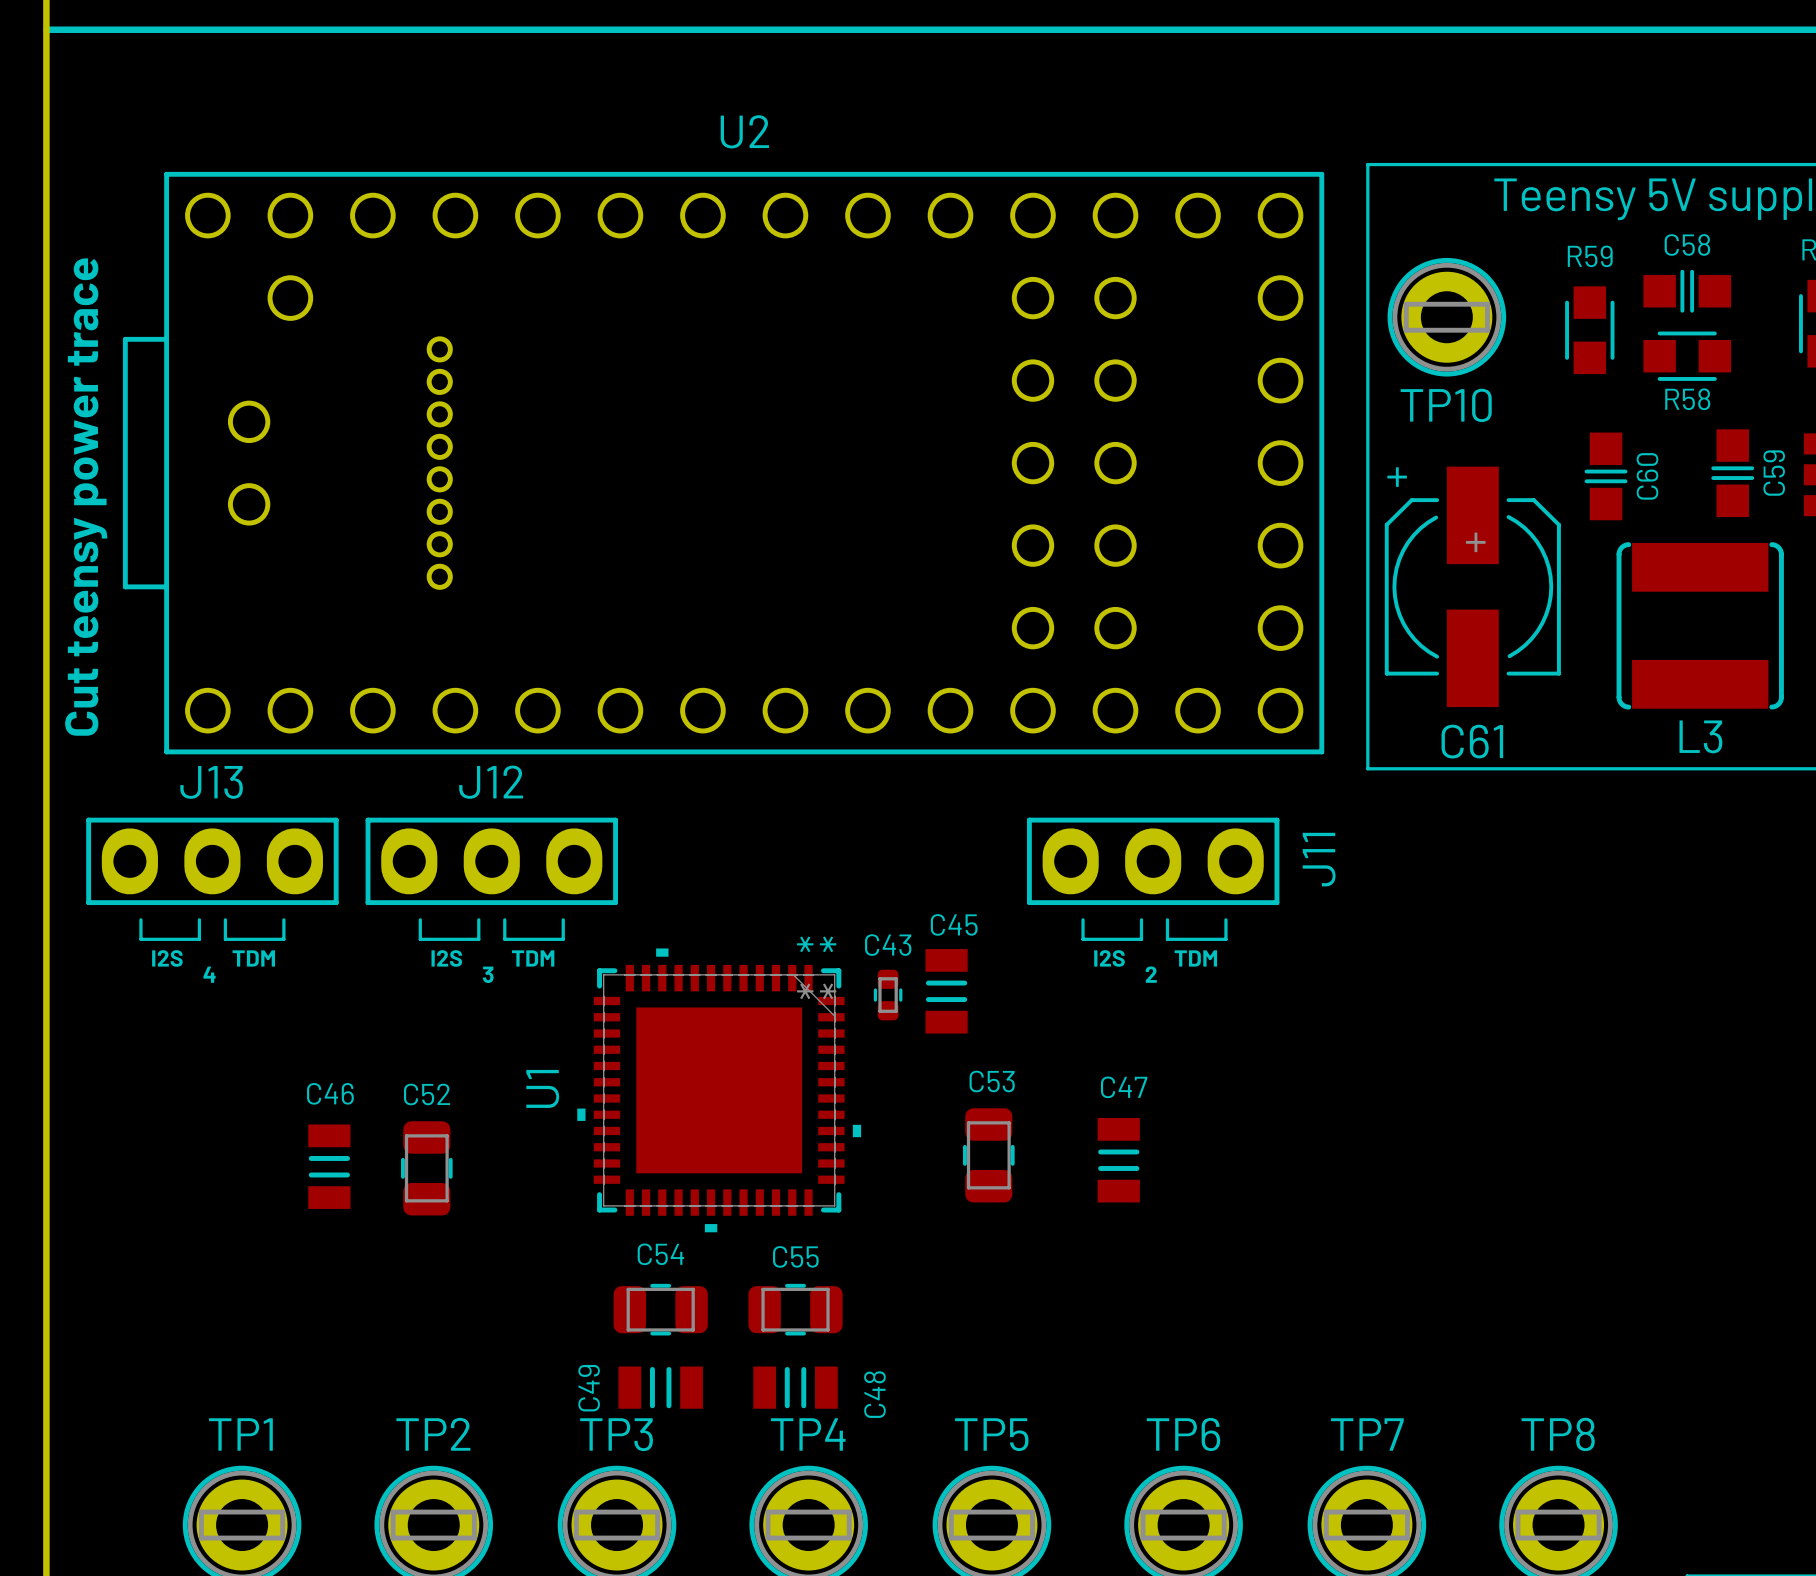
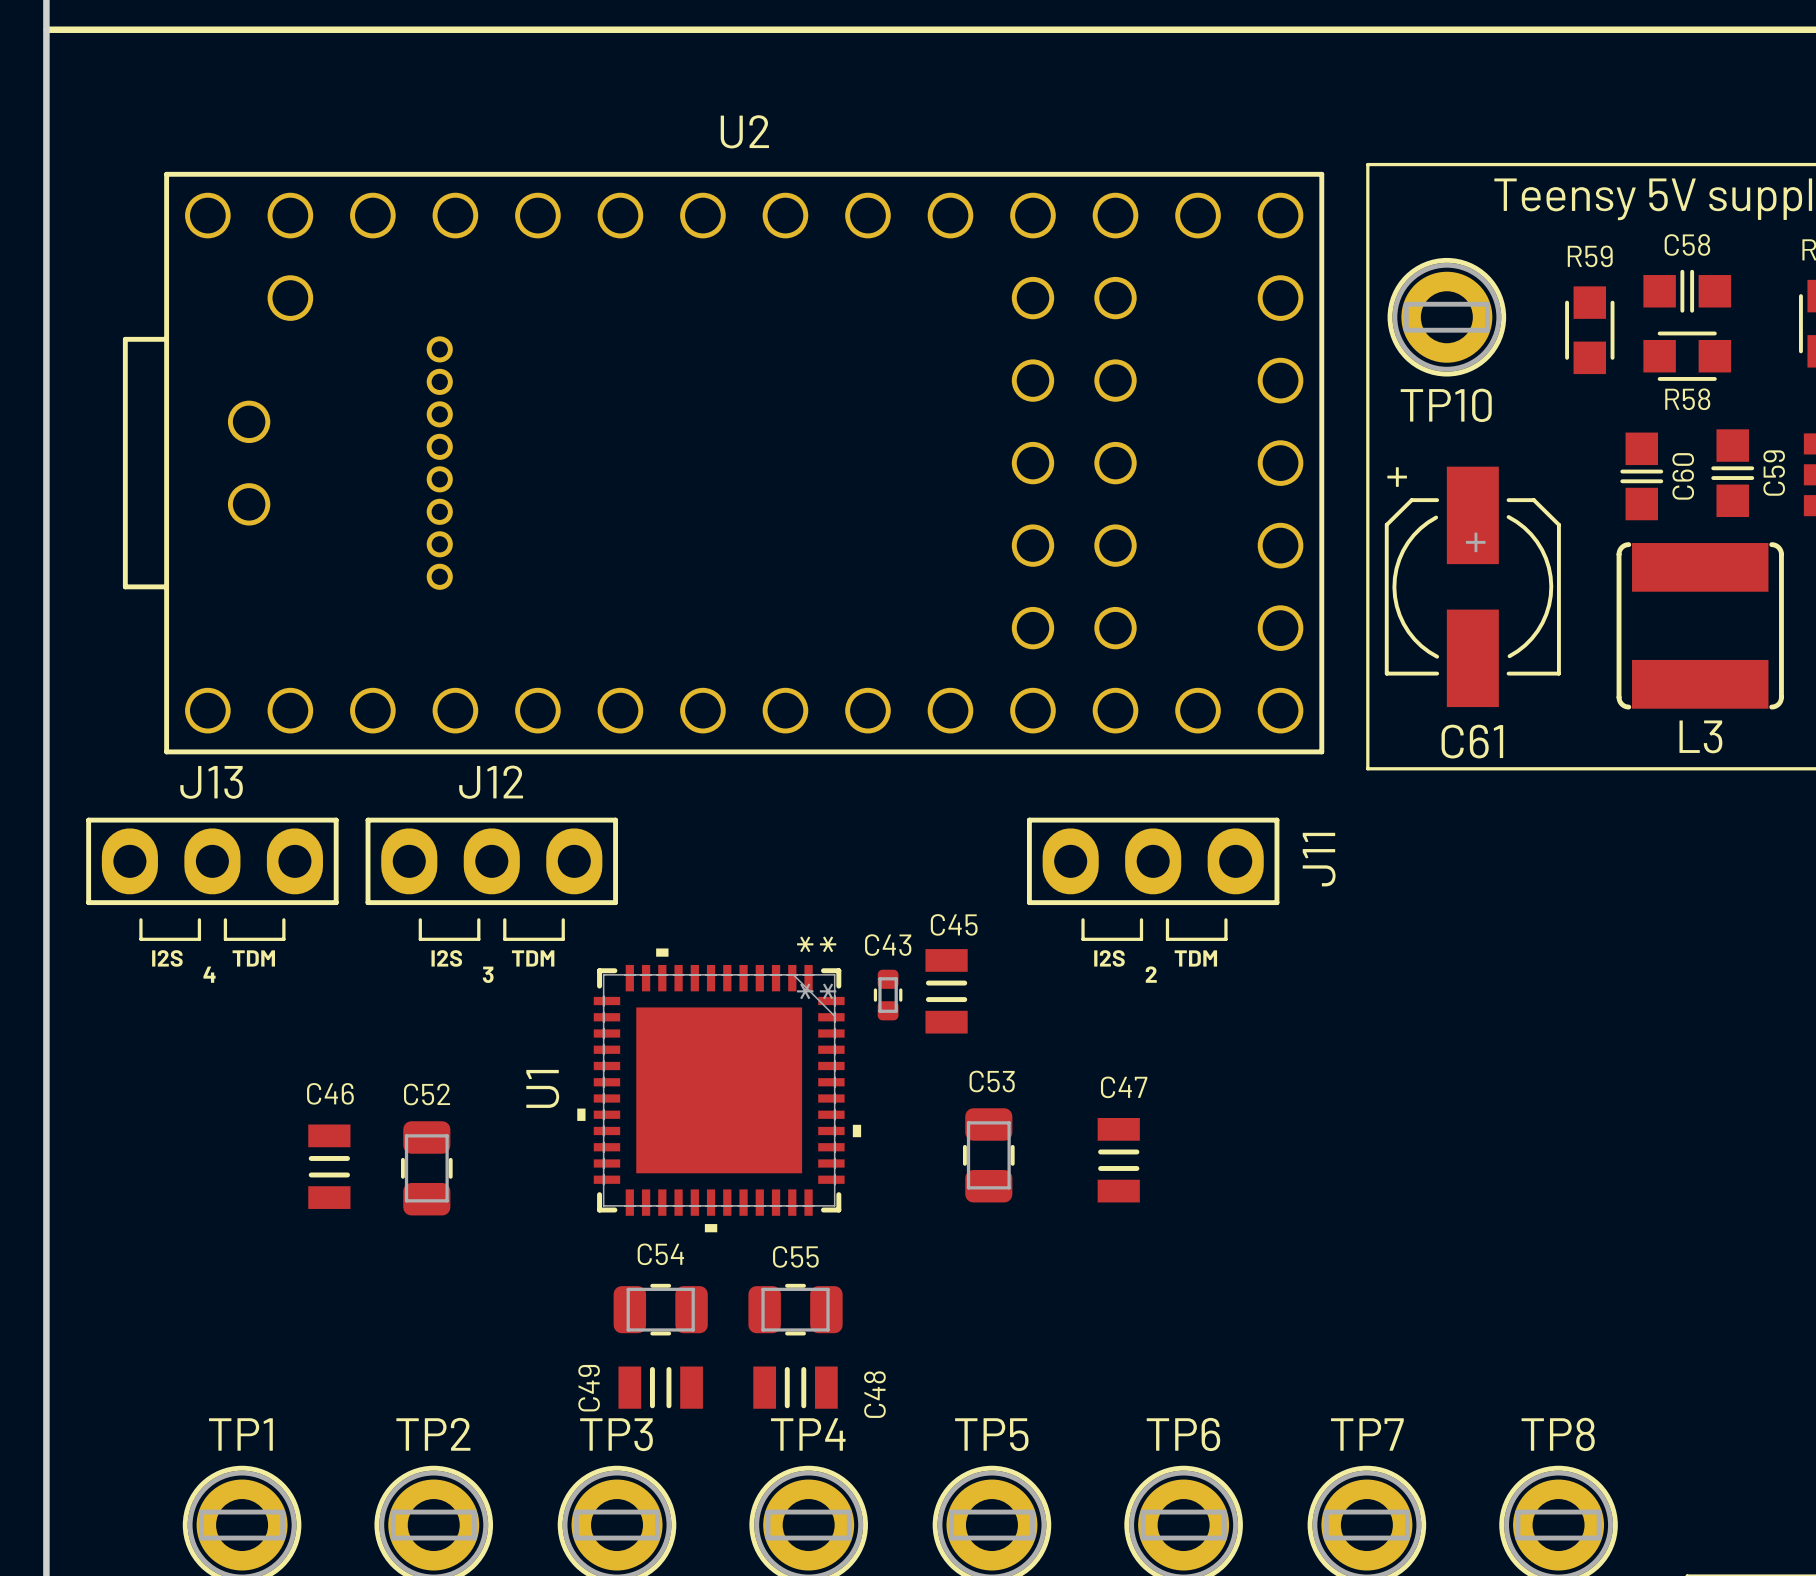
C60 position: (1606, 476) -> (1641, 476)
text: Cut teensy power trace (86, 496) -> none

